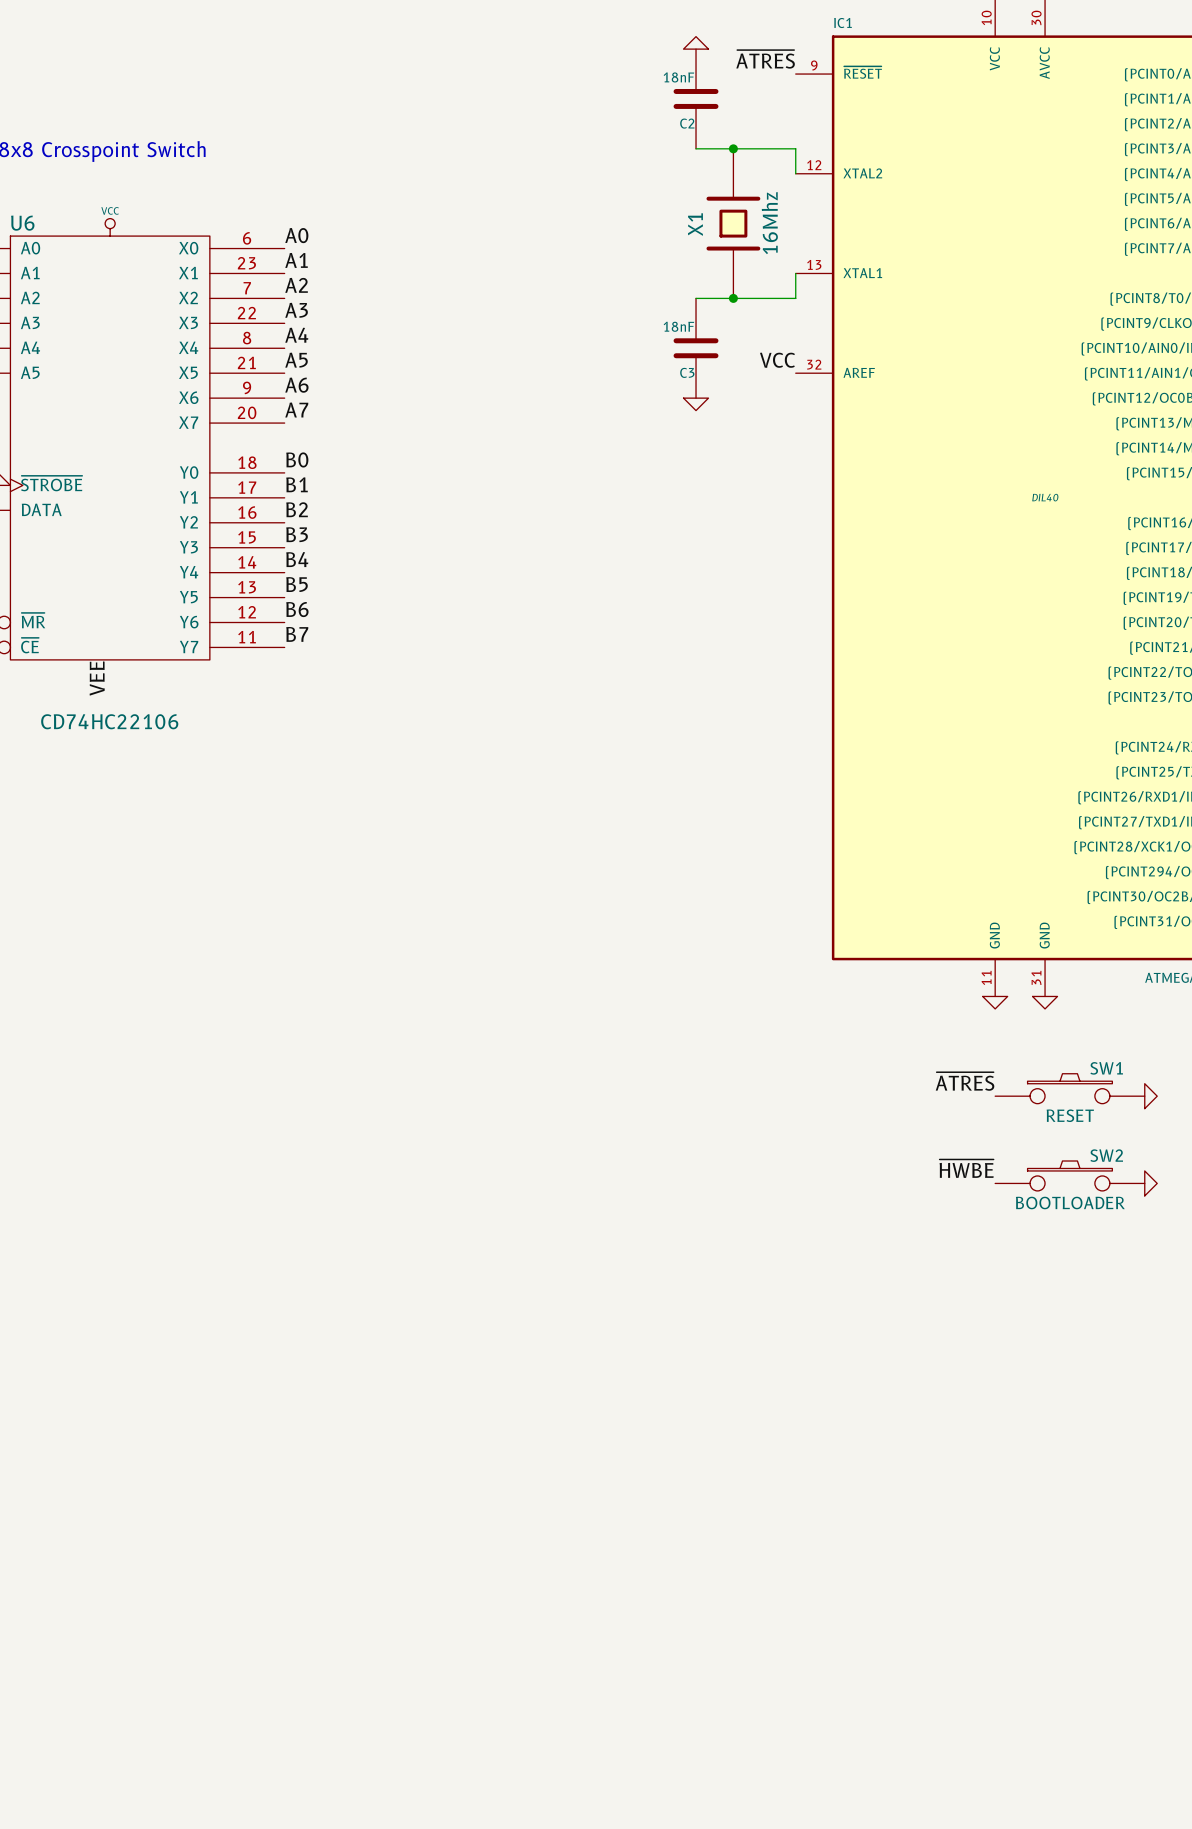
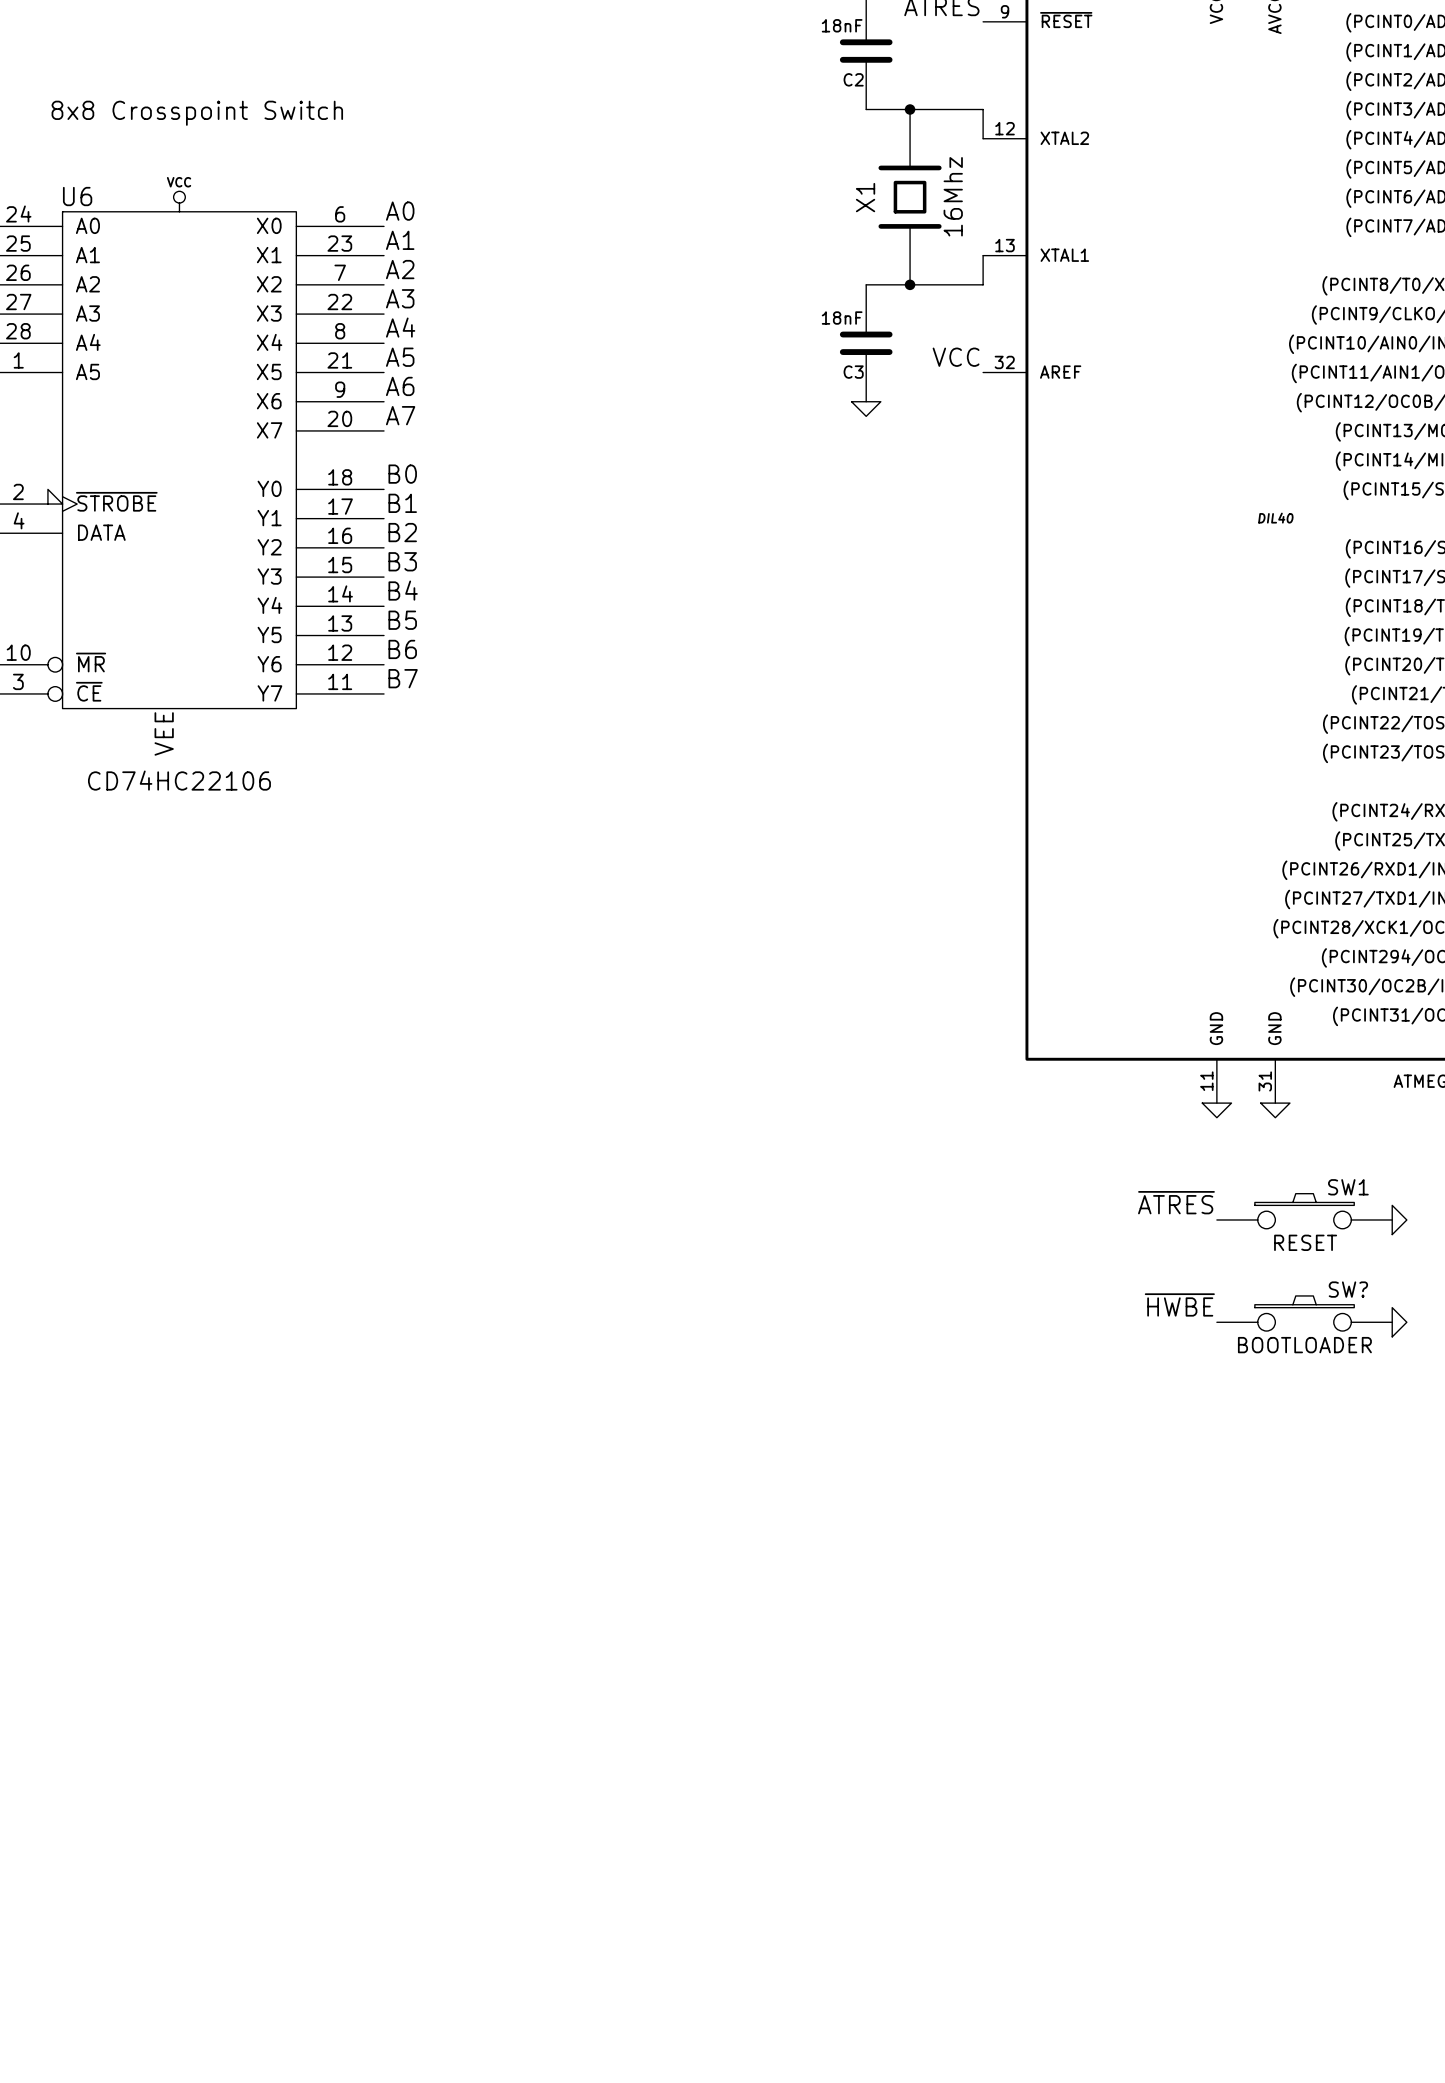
SW2 name: SW2 (1106, 1155) -> SW? (1348, 1289)

